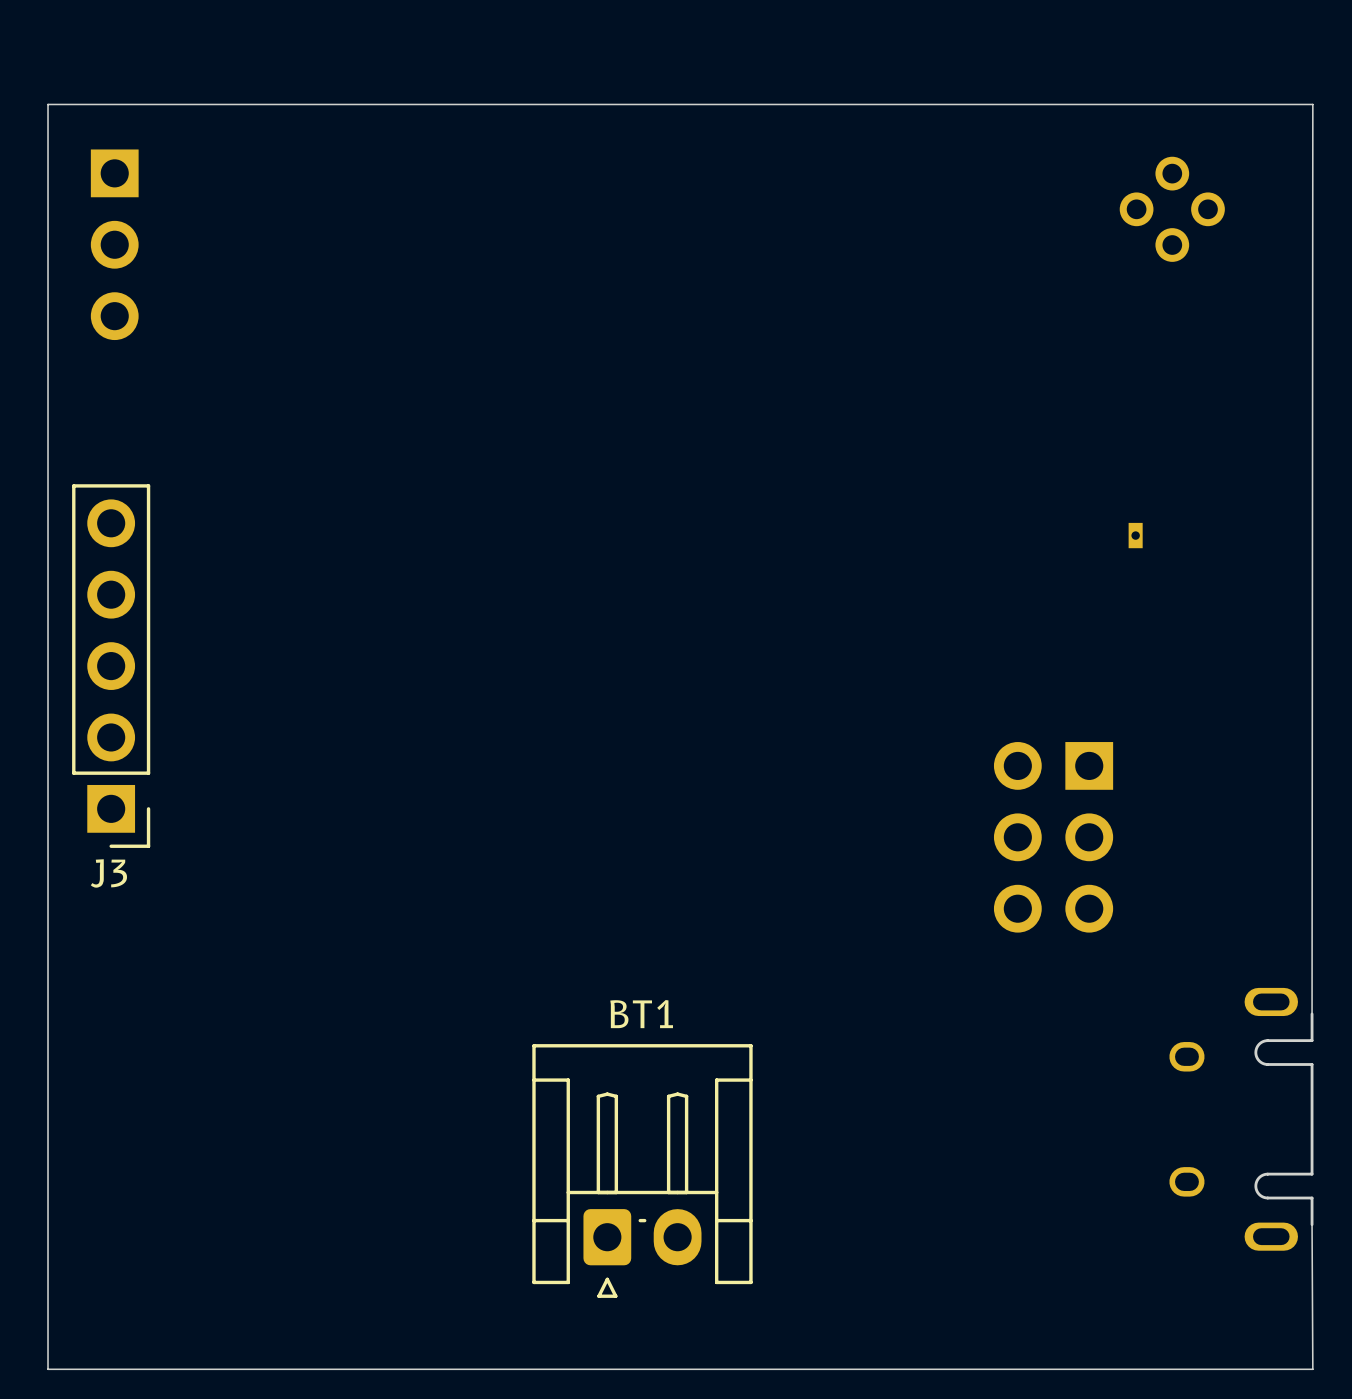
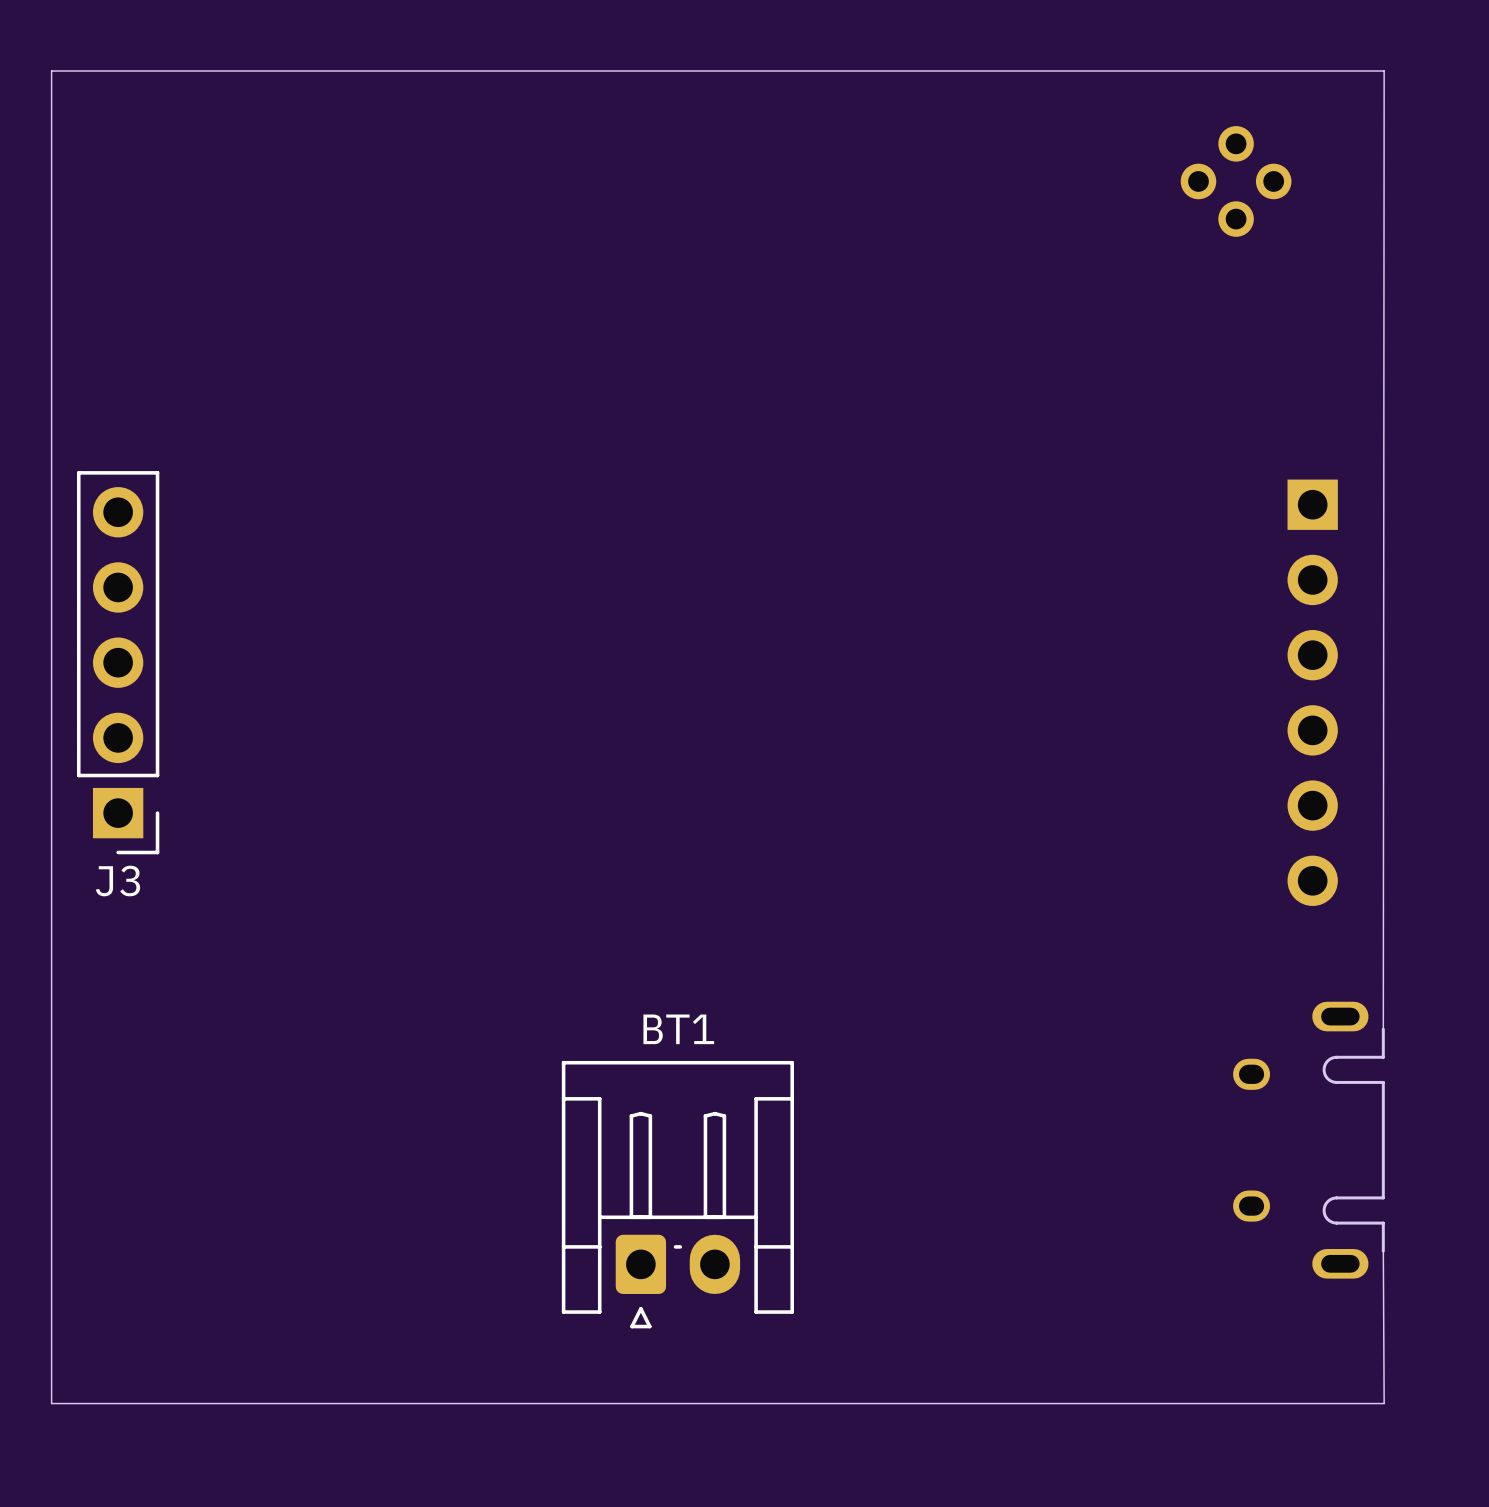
part: (114, 244) -> none
part: (1135, 535) -> none
part: none -> (1312, 692)
part: (1053, 837) -> none

